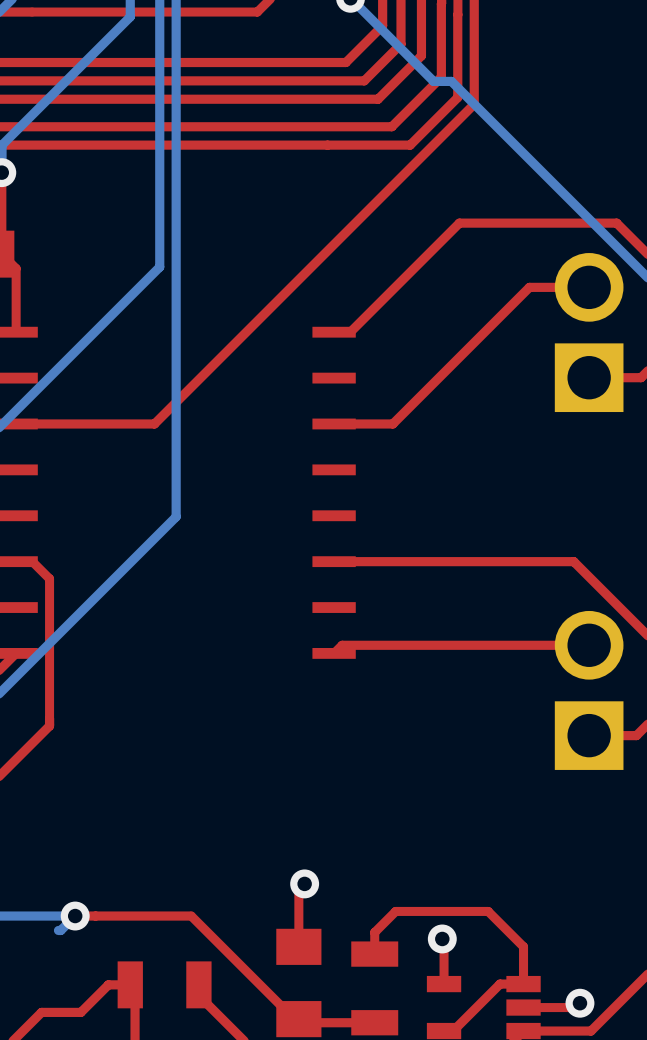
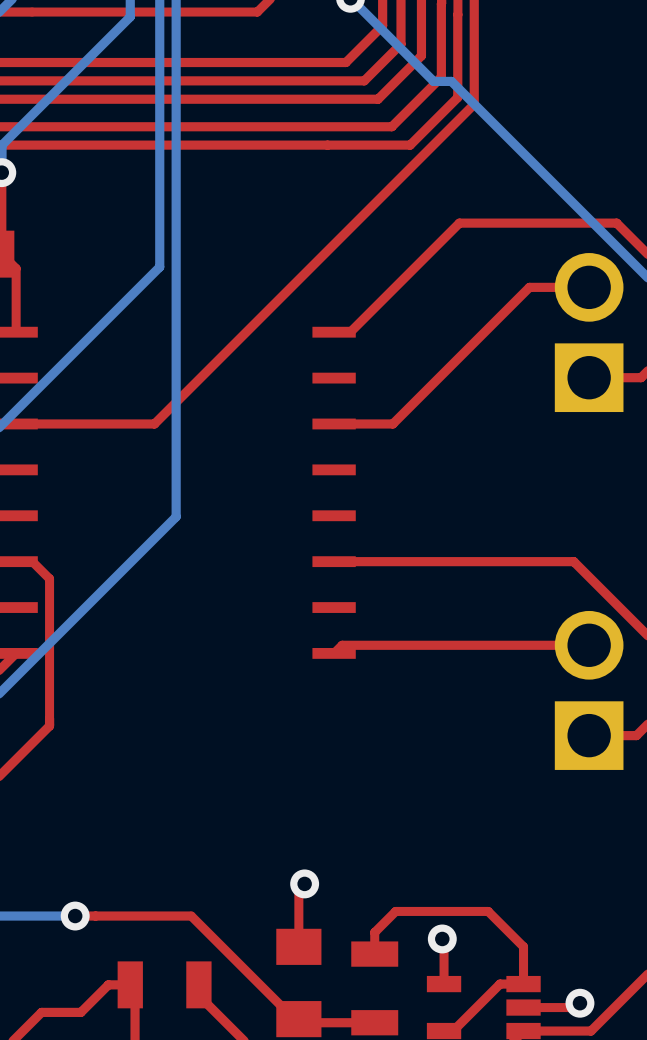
bottom track: (75, 916) (58, 930) -> none

